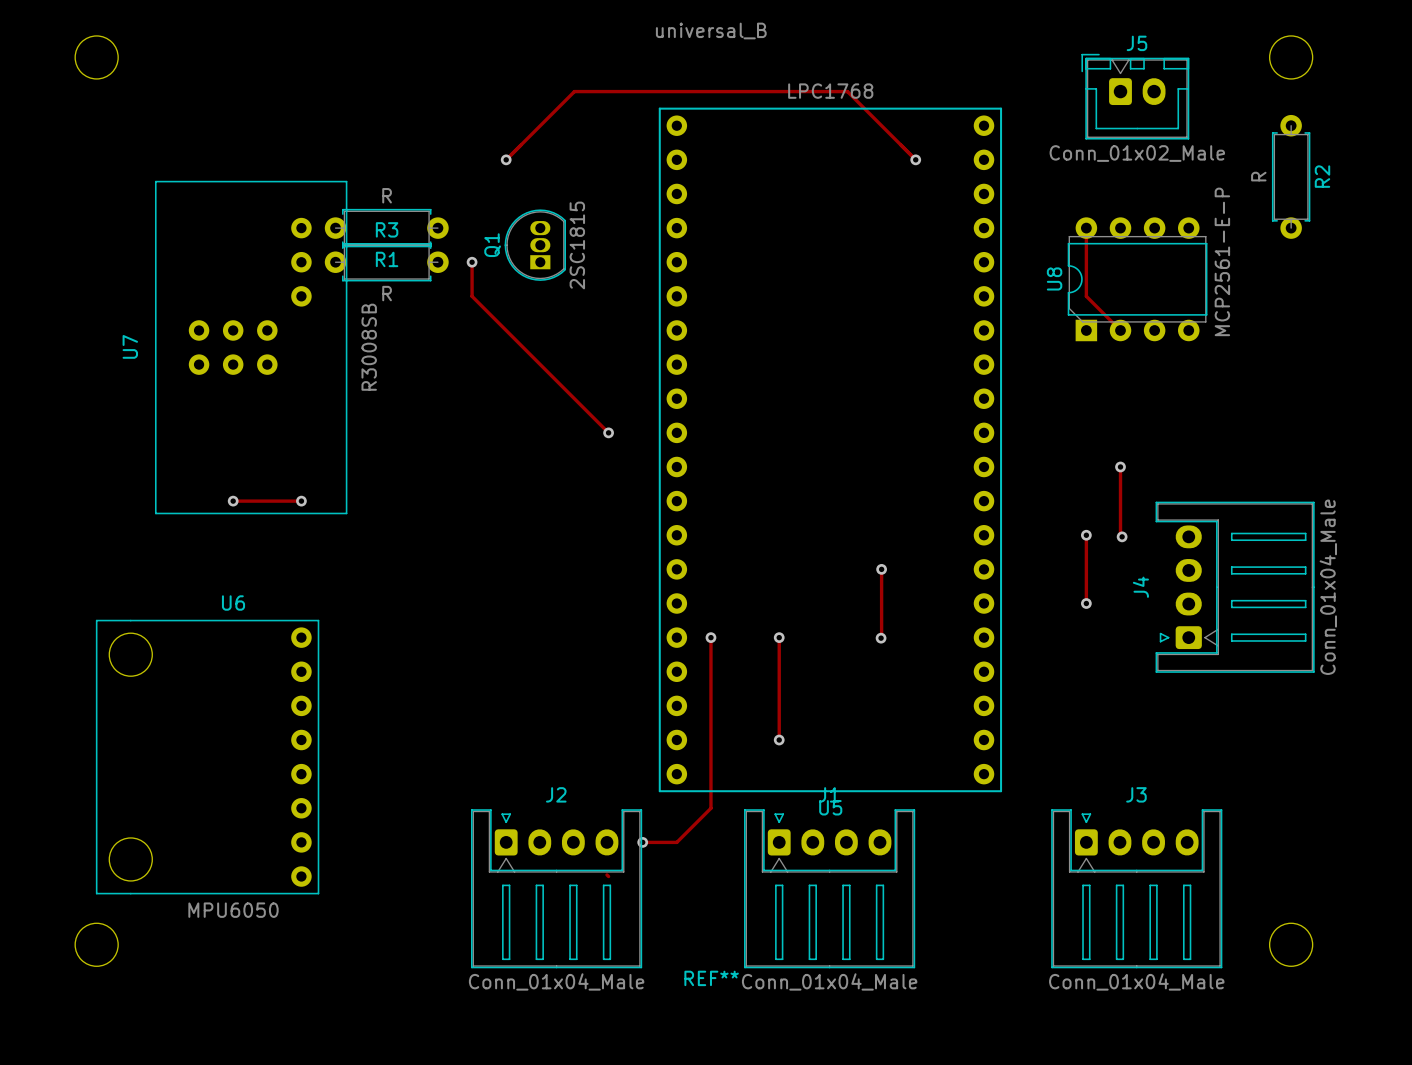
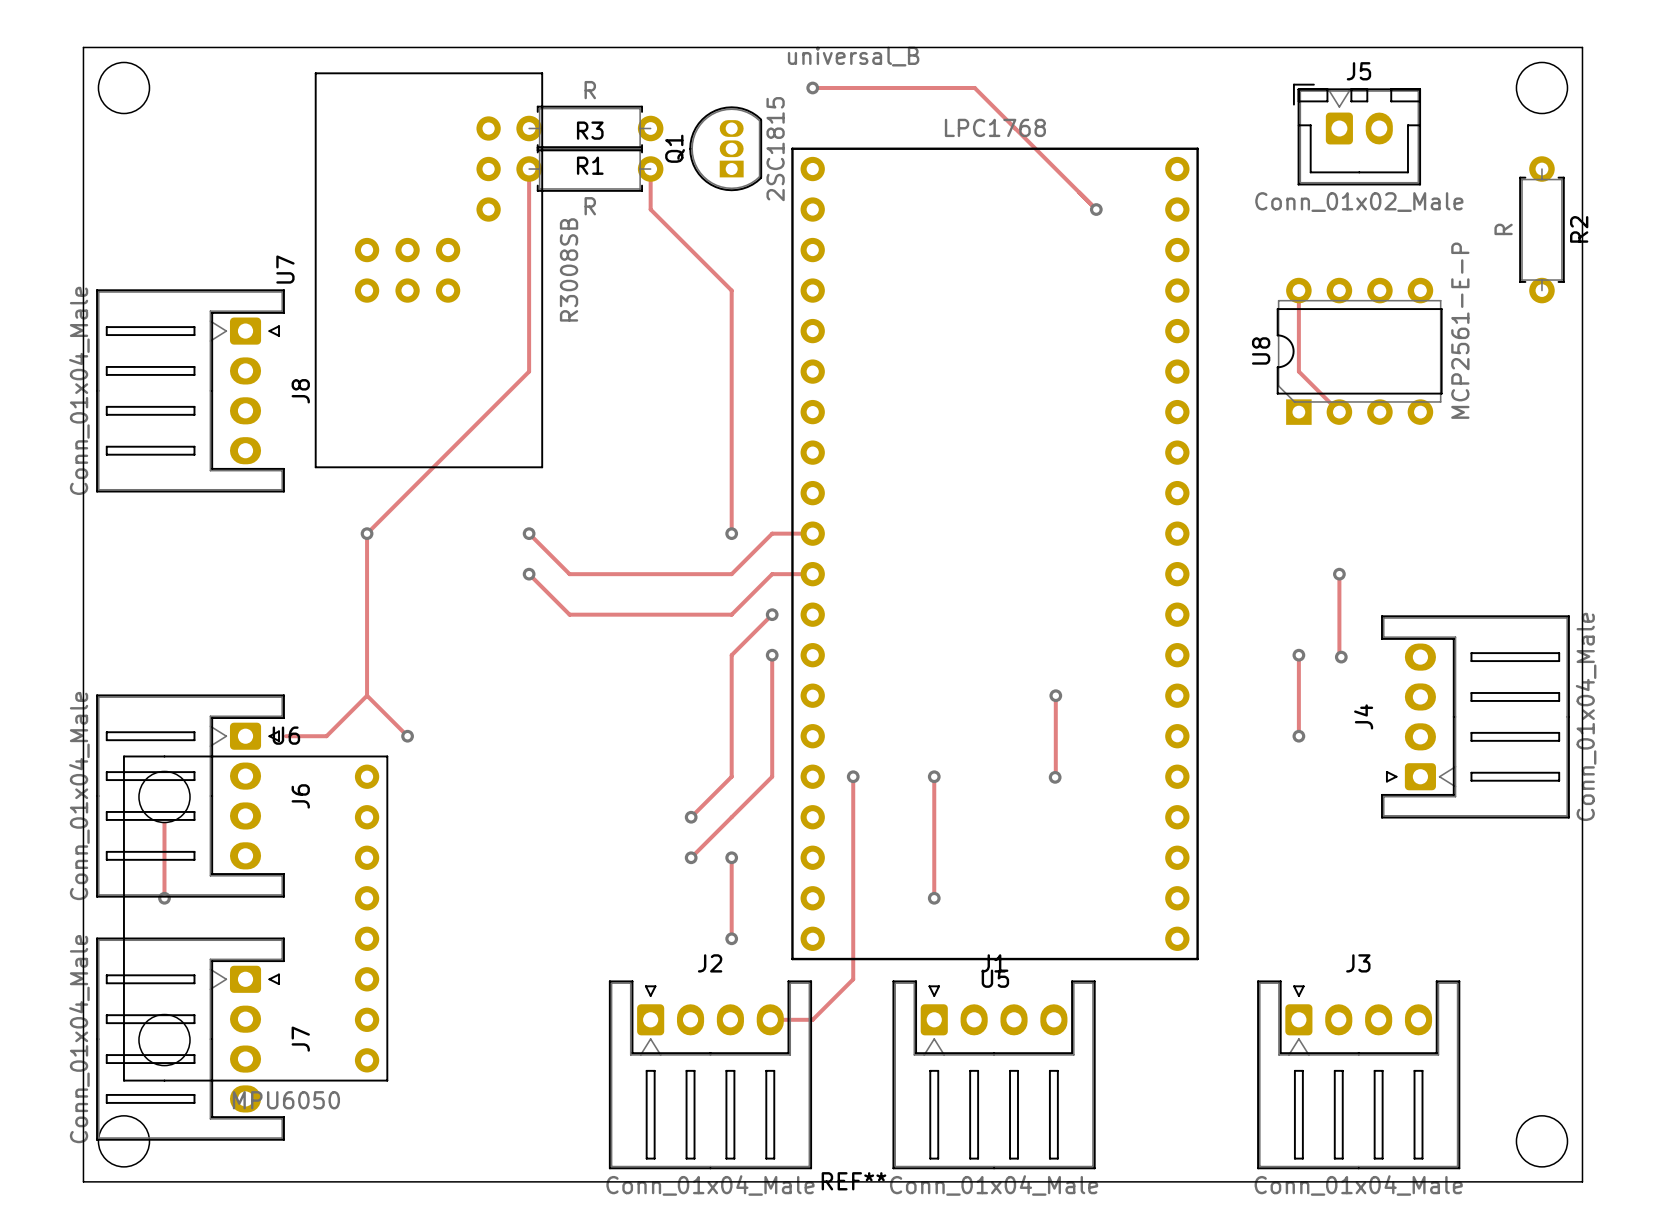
board edge: none -> (83, 47) (1582, 47) (1582, 1181) (83, 1181) (83, 47)
via: none -> (812, 87)
track: (847, 91) (574, 91) (506, 159) -> (1015, 128) (974, 87) (812, 87)
track: none -> (529, 169) (529, 371) (367, 533) (367, 695)
via: (506, 159) -> none
R1 position: (386, 228) -> (589, 128)
Q1 position: (535, 245) -> (725, 148)
R3 position: (386, 262) -> (589, 169)
track: (472, 262) (472, 296) (608, 432) -> (650, 169) (650, 209) (731, 290) (731, 533)
via: (472, 262) -> none
J8: none -> Conn_01x04_Male (190, 390)
U7 position: (251, 347) -> (428, 270)
via: none -> (367, 533)
track: none -> (529, 533) (569, 574) (731, 574) (772, 533) (812, 533)
via: none -> (529, 533)
track: none -> (529, 574) (569, 614) (731, 614) (772, 574) (812, 574)
via: none -> (529, 574)
track: (233, 501) (301, 501) -> none
via: (233, 501) -> none
via: (301, 501) -> none
track: none -> (772, 614) (731, 655) (731, 776) (691, 817)
via: none -> (772, 614)
track: none -> (772, 655) (772, 776) (691, 857)
via: none -> (772, 655)
track: none -> (367, 695) (407, 736)
track: none -> (367, 695) (326, 736) (286, 736)
via: none -> (407, 736)
J6: none -> Conn_01x04_Male (190, 796)
track: none -> (164, 817) (164, 898)
via: none -> (691, 817)
via: none -> (691, 857)
track: none -> (731, 857) (731, 938)
via: none -> (731, 857)
via: none -> (164, 898)
via: none -> (731, 938)
via: (642, 842) -> none
J7: none -> Conn_01x04_Male (190, 1039)
track: (606, 874) (608, 876) -> none
J2 position: (556, 888) -> (710, 1074)

